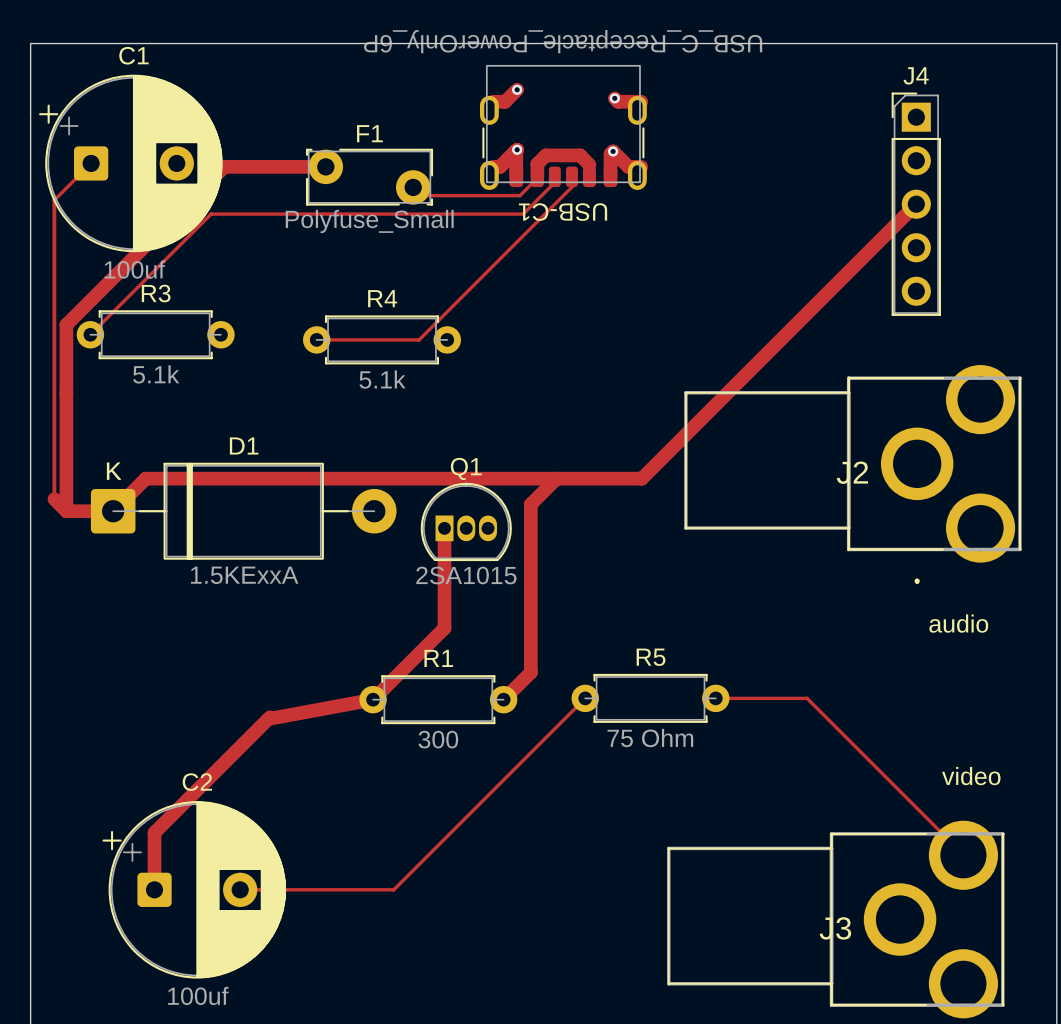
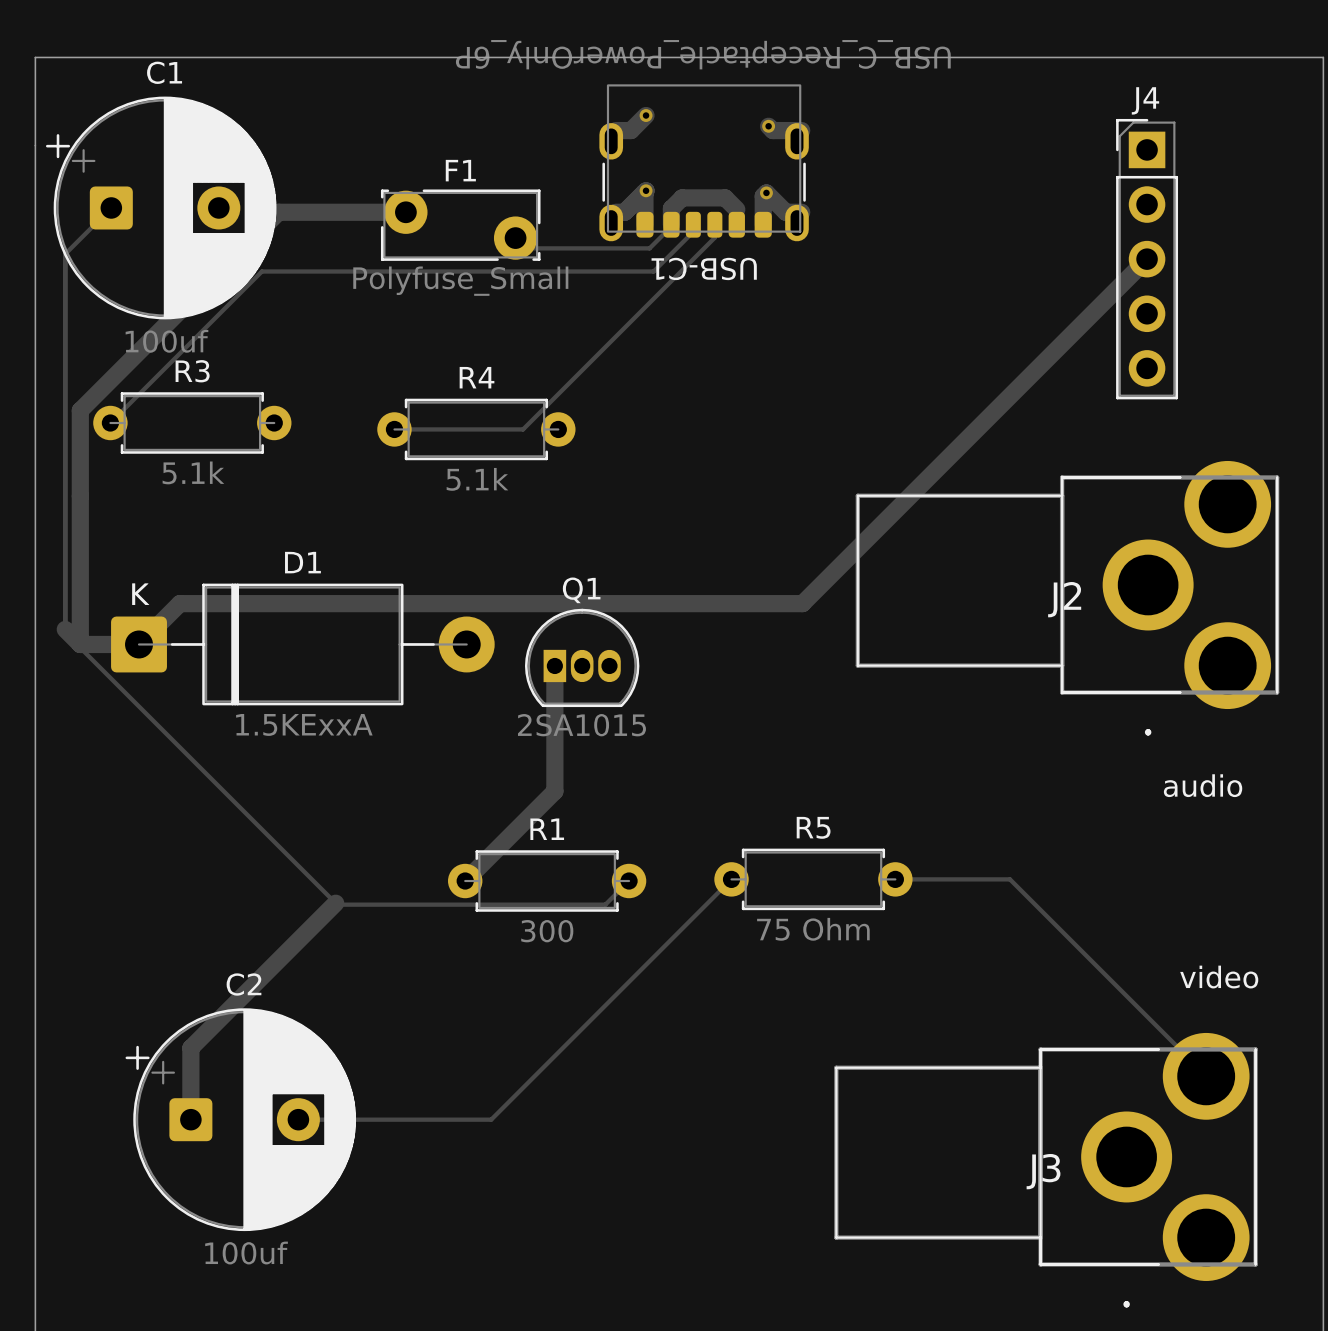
track: (556, 478) (530, 504) (530, 672) (503, 699) -> none
track: none -> (65, 632) (335, 903)
track: (373, 699) (271, 718) -> (629, 881) (605, 904) (337, 904)

